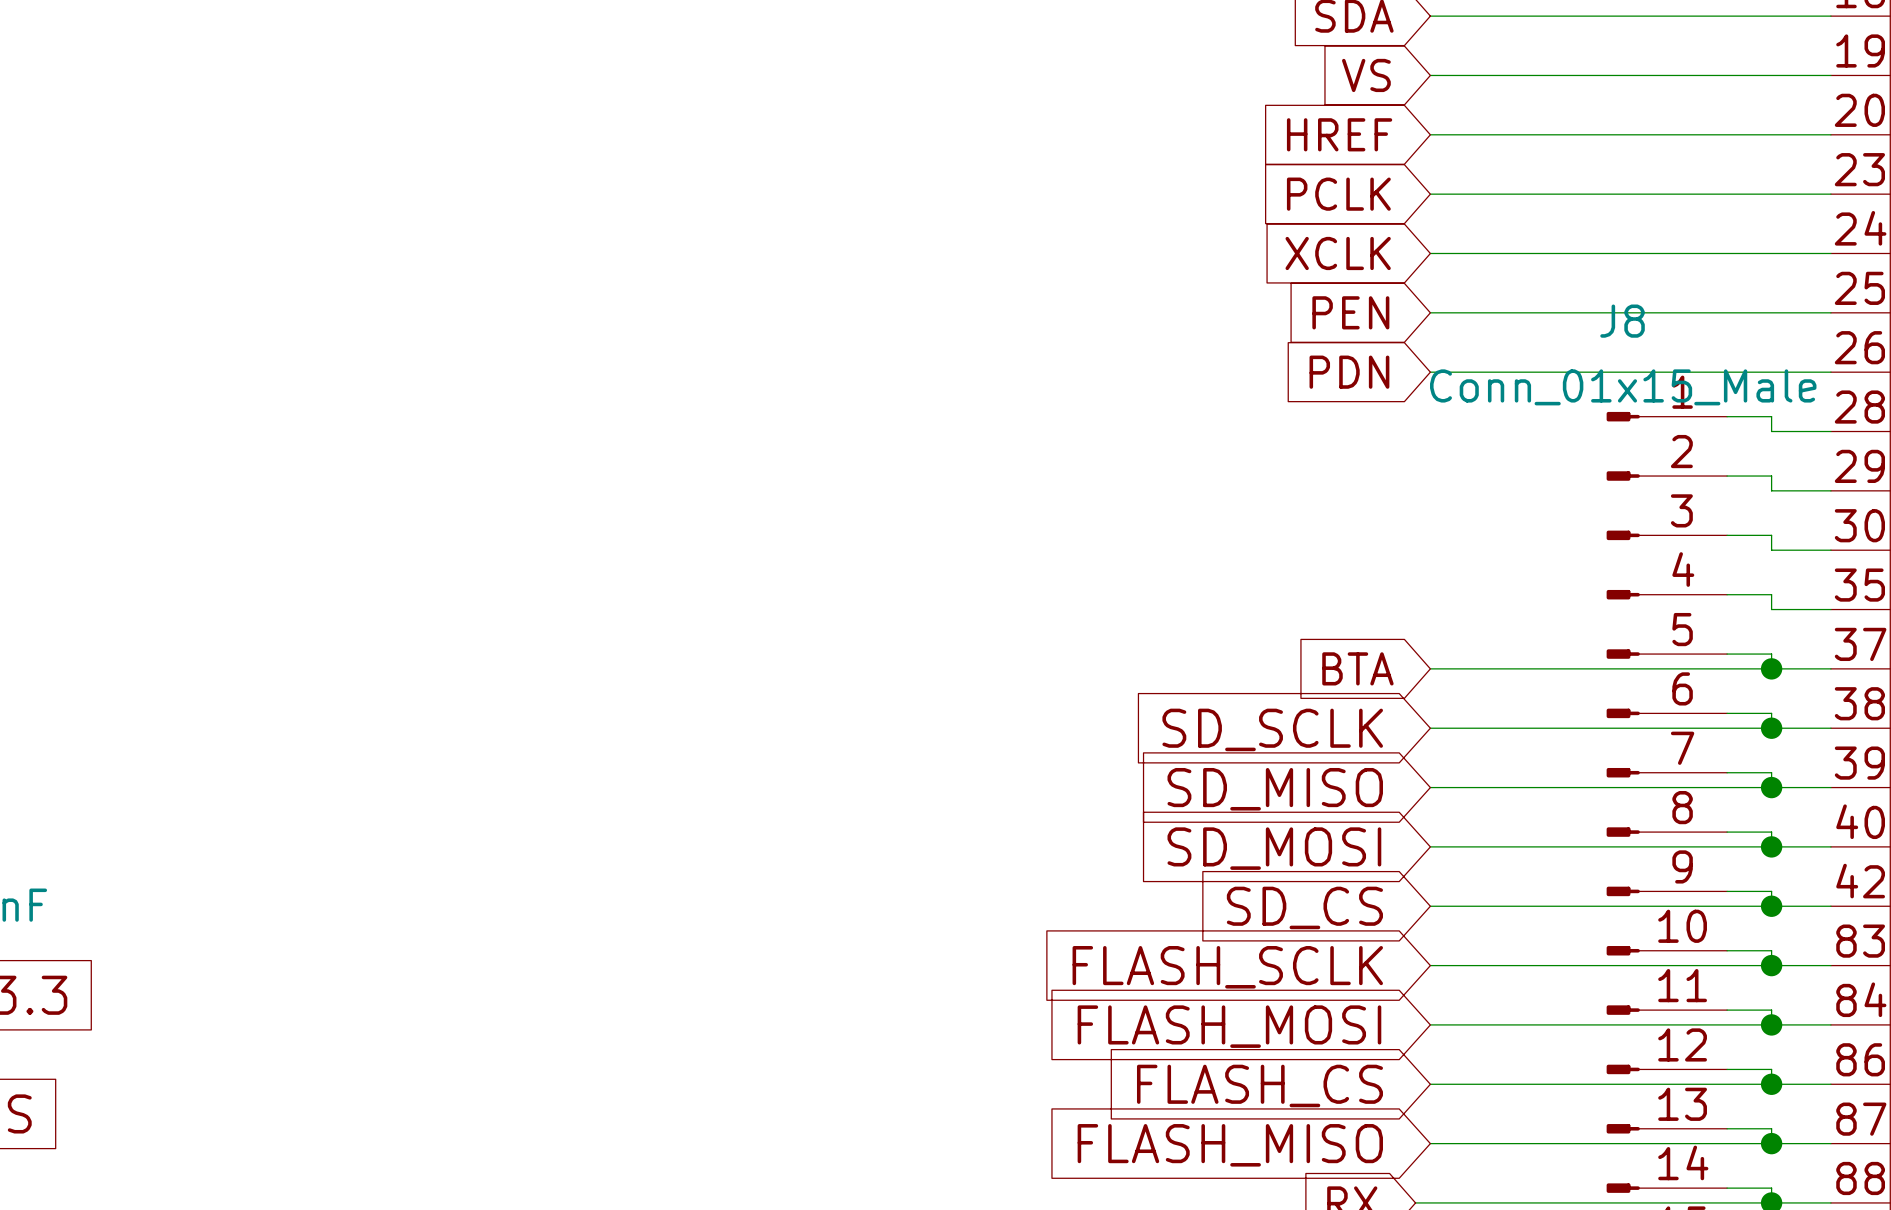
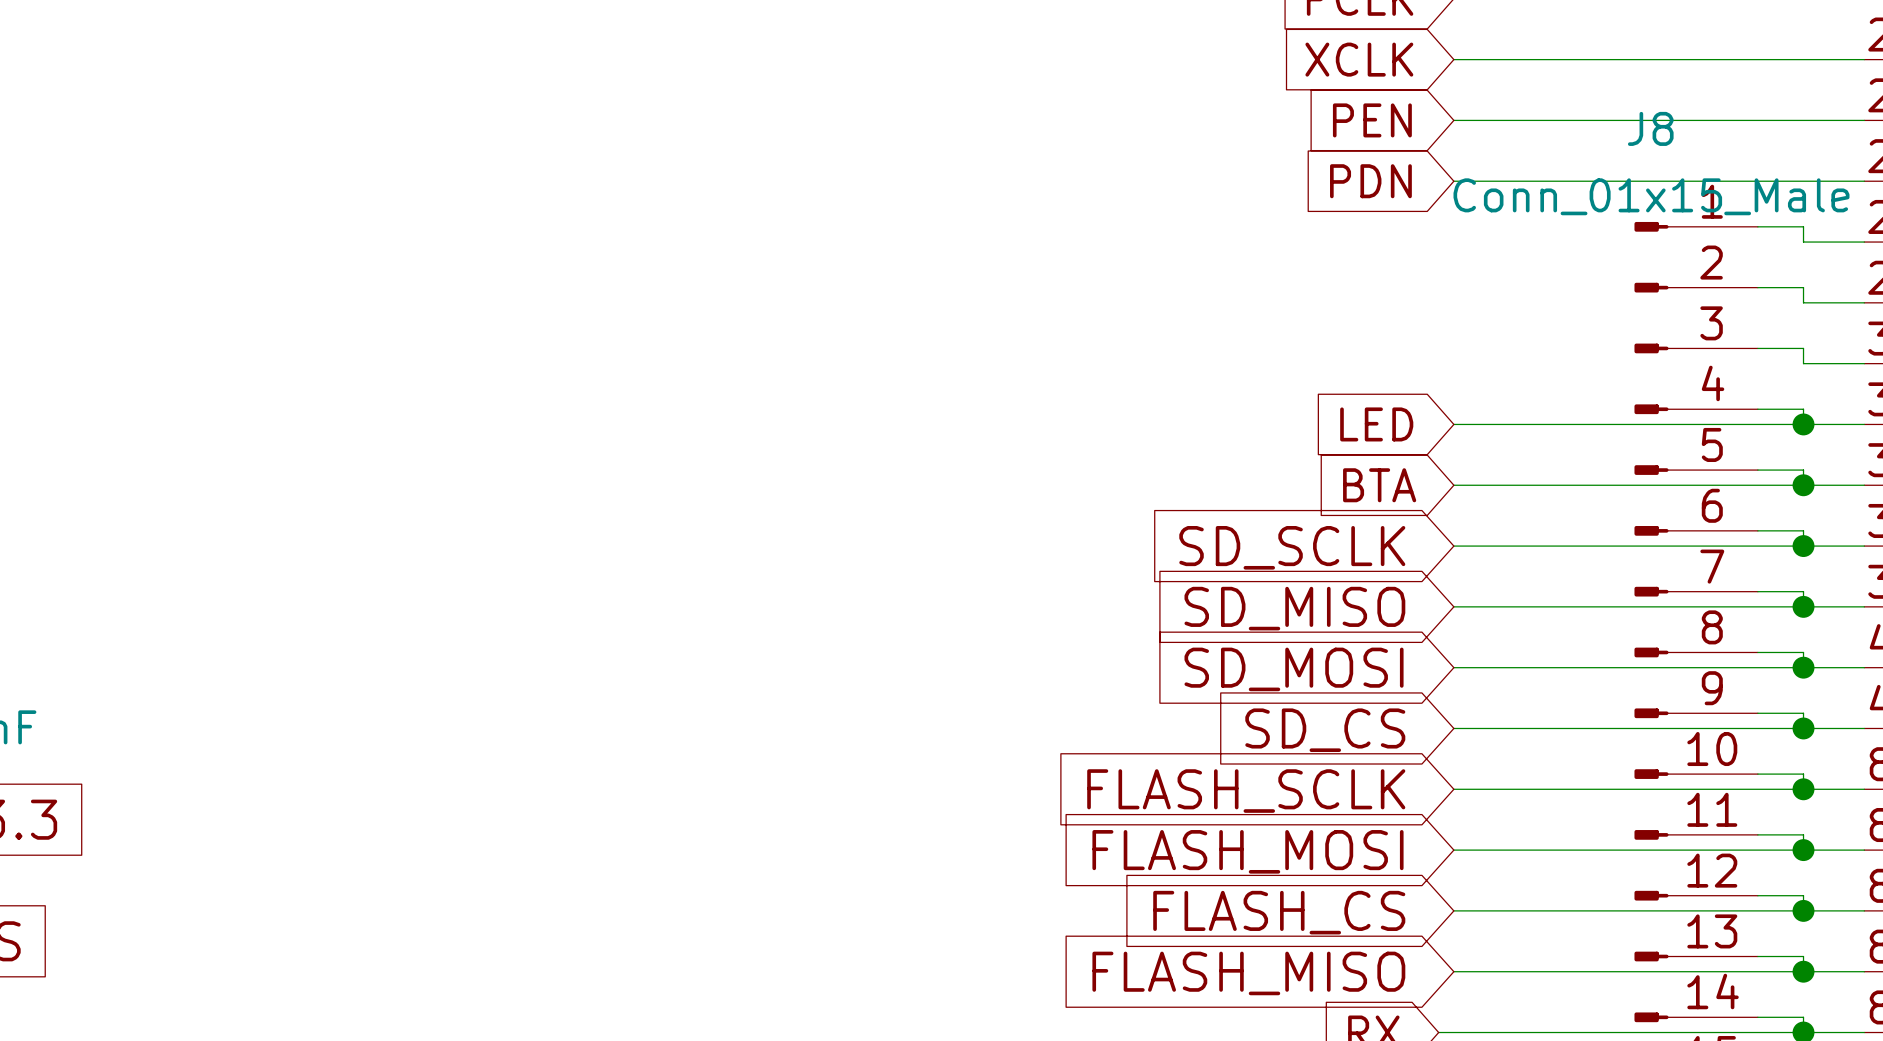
global label: none -> LED (1376, 424)
wire: none -> (1453, 424) (1803, 424)
junction: none -> (1803, 424)

